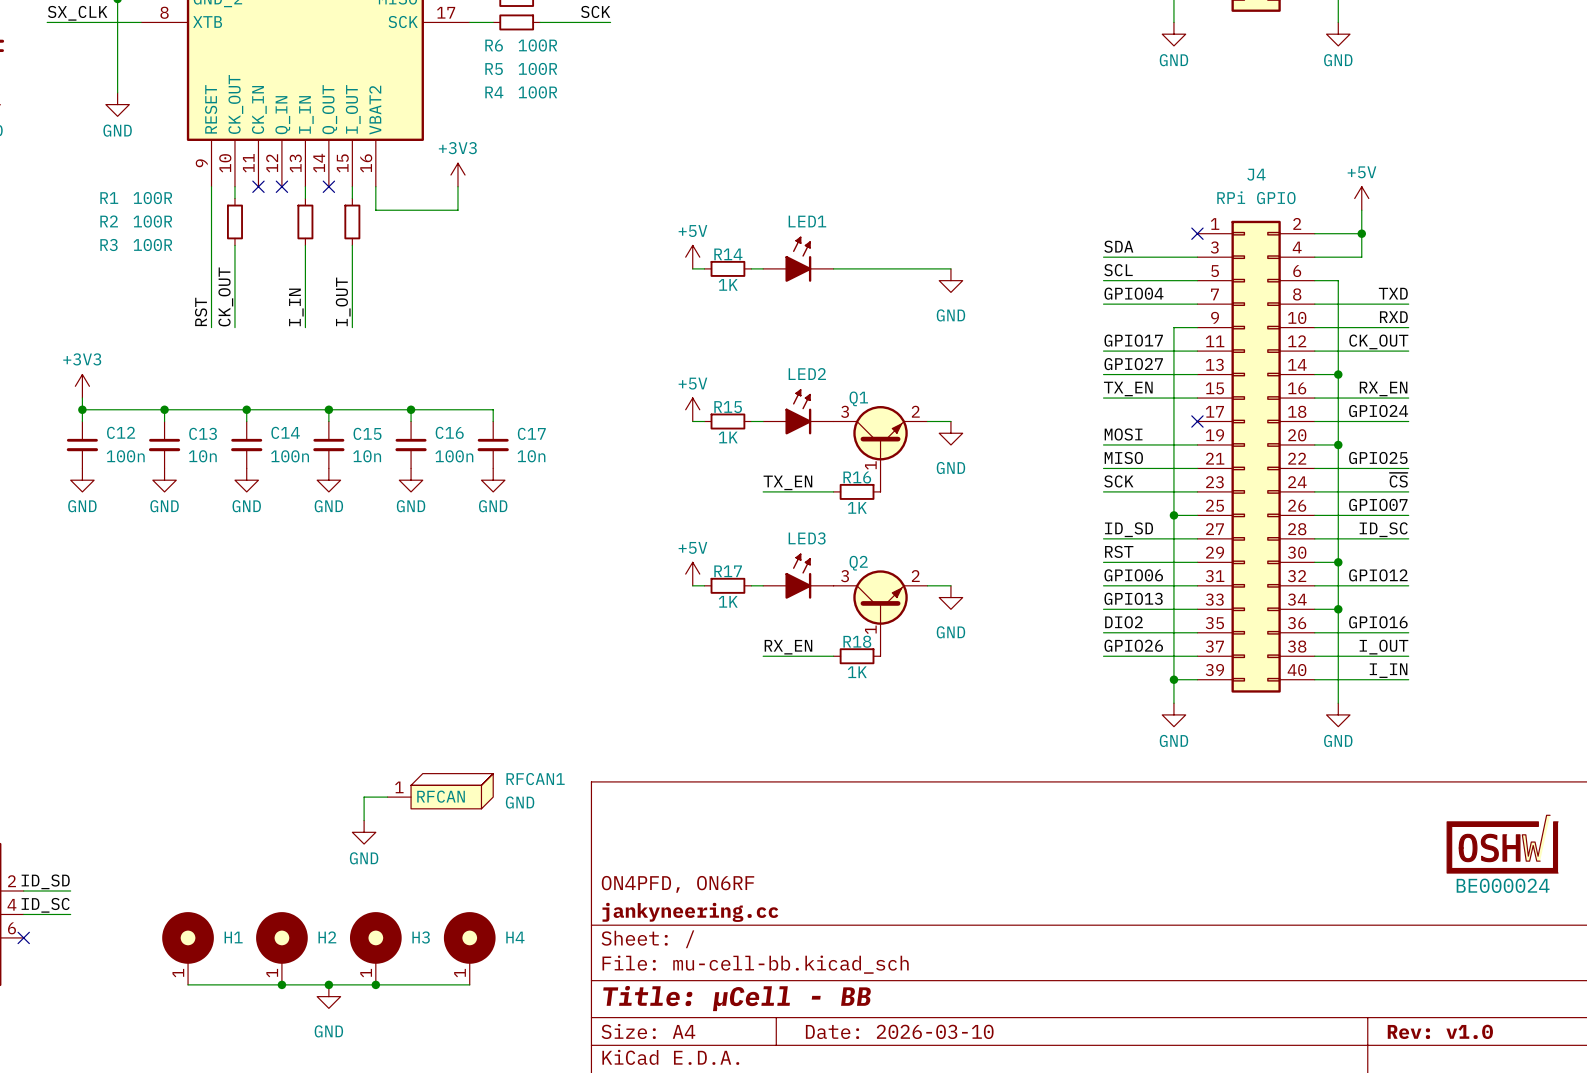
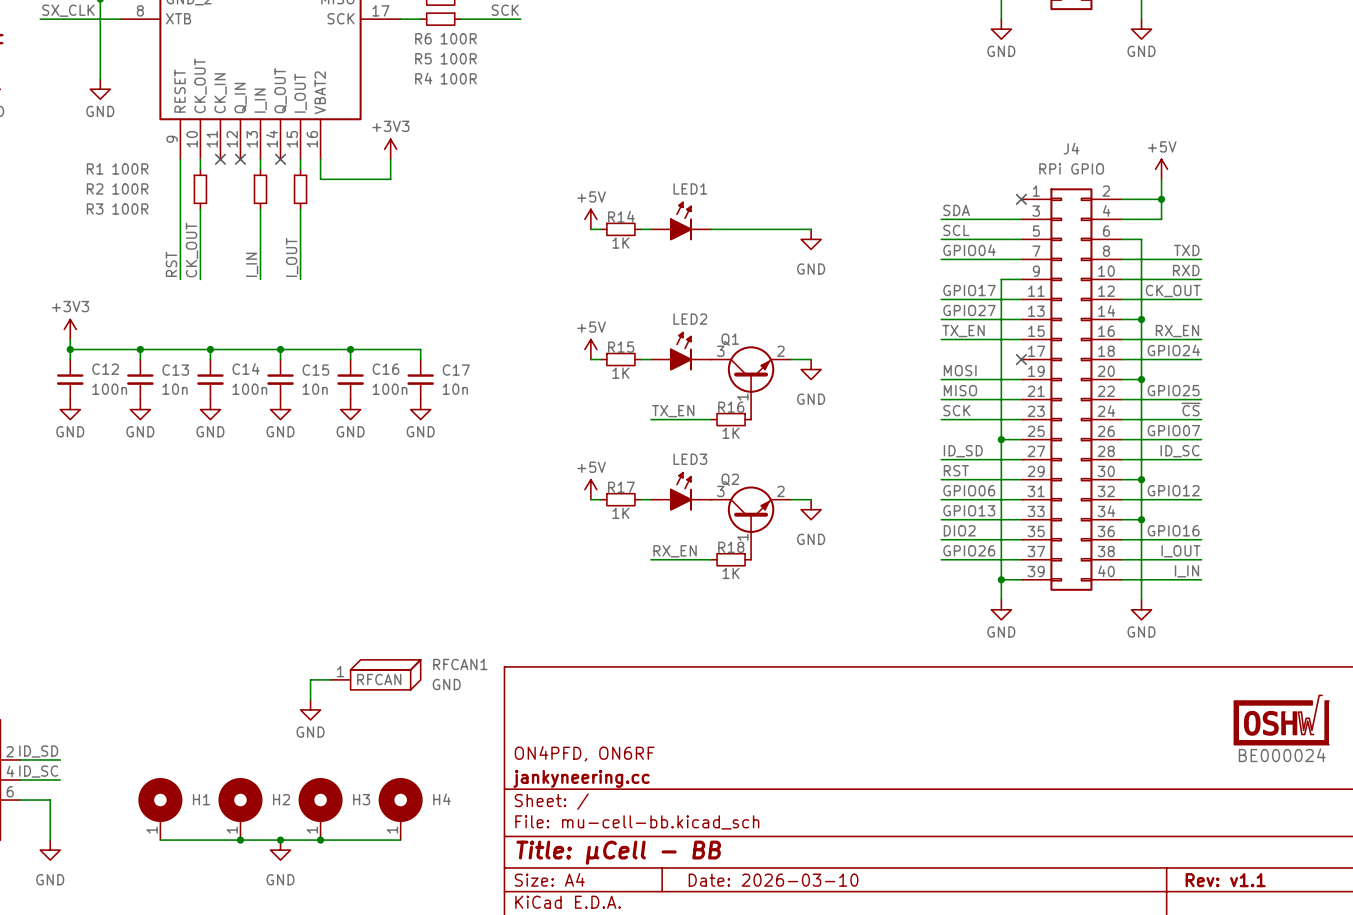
wire: none -> (20, 800) (50, 800) (50, 840)
no-connect mark: (23, 937) -> none
power symbol: none -> GND (50, 850)
title block: Rev: v1.0 (1440, 1031) -> Rev: v1.1 (1225, 880)

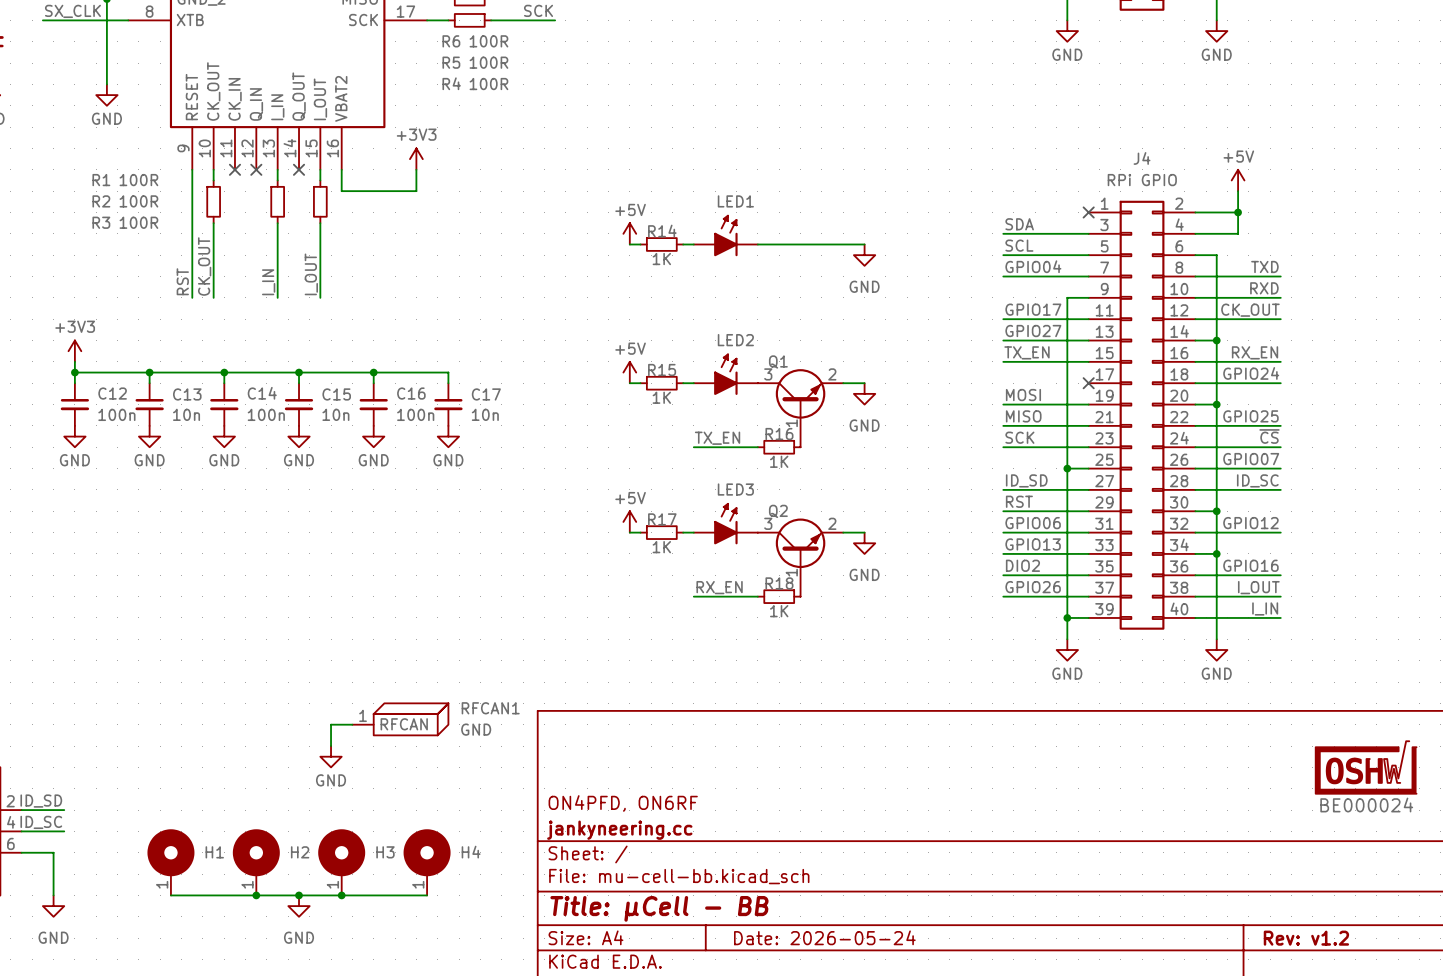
title block: Date: 2026-03-10 (773, 880) -> Date: 2026-05-24 (824, 937)
title block: Rev: v1.1 (1225, 880) -> Rev: v1.2 (1306, 938)

